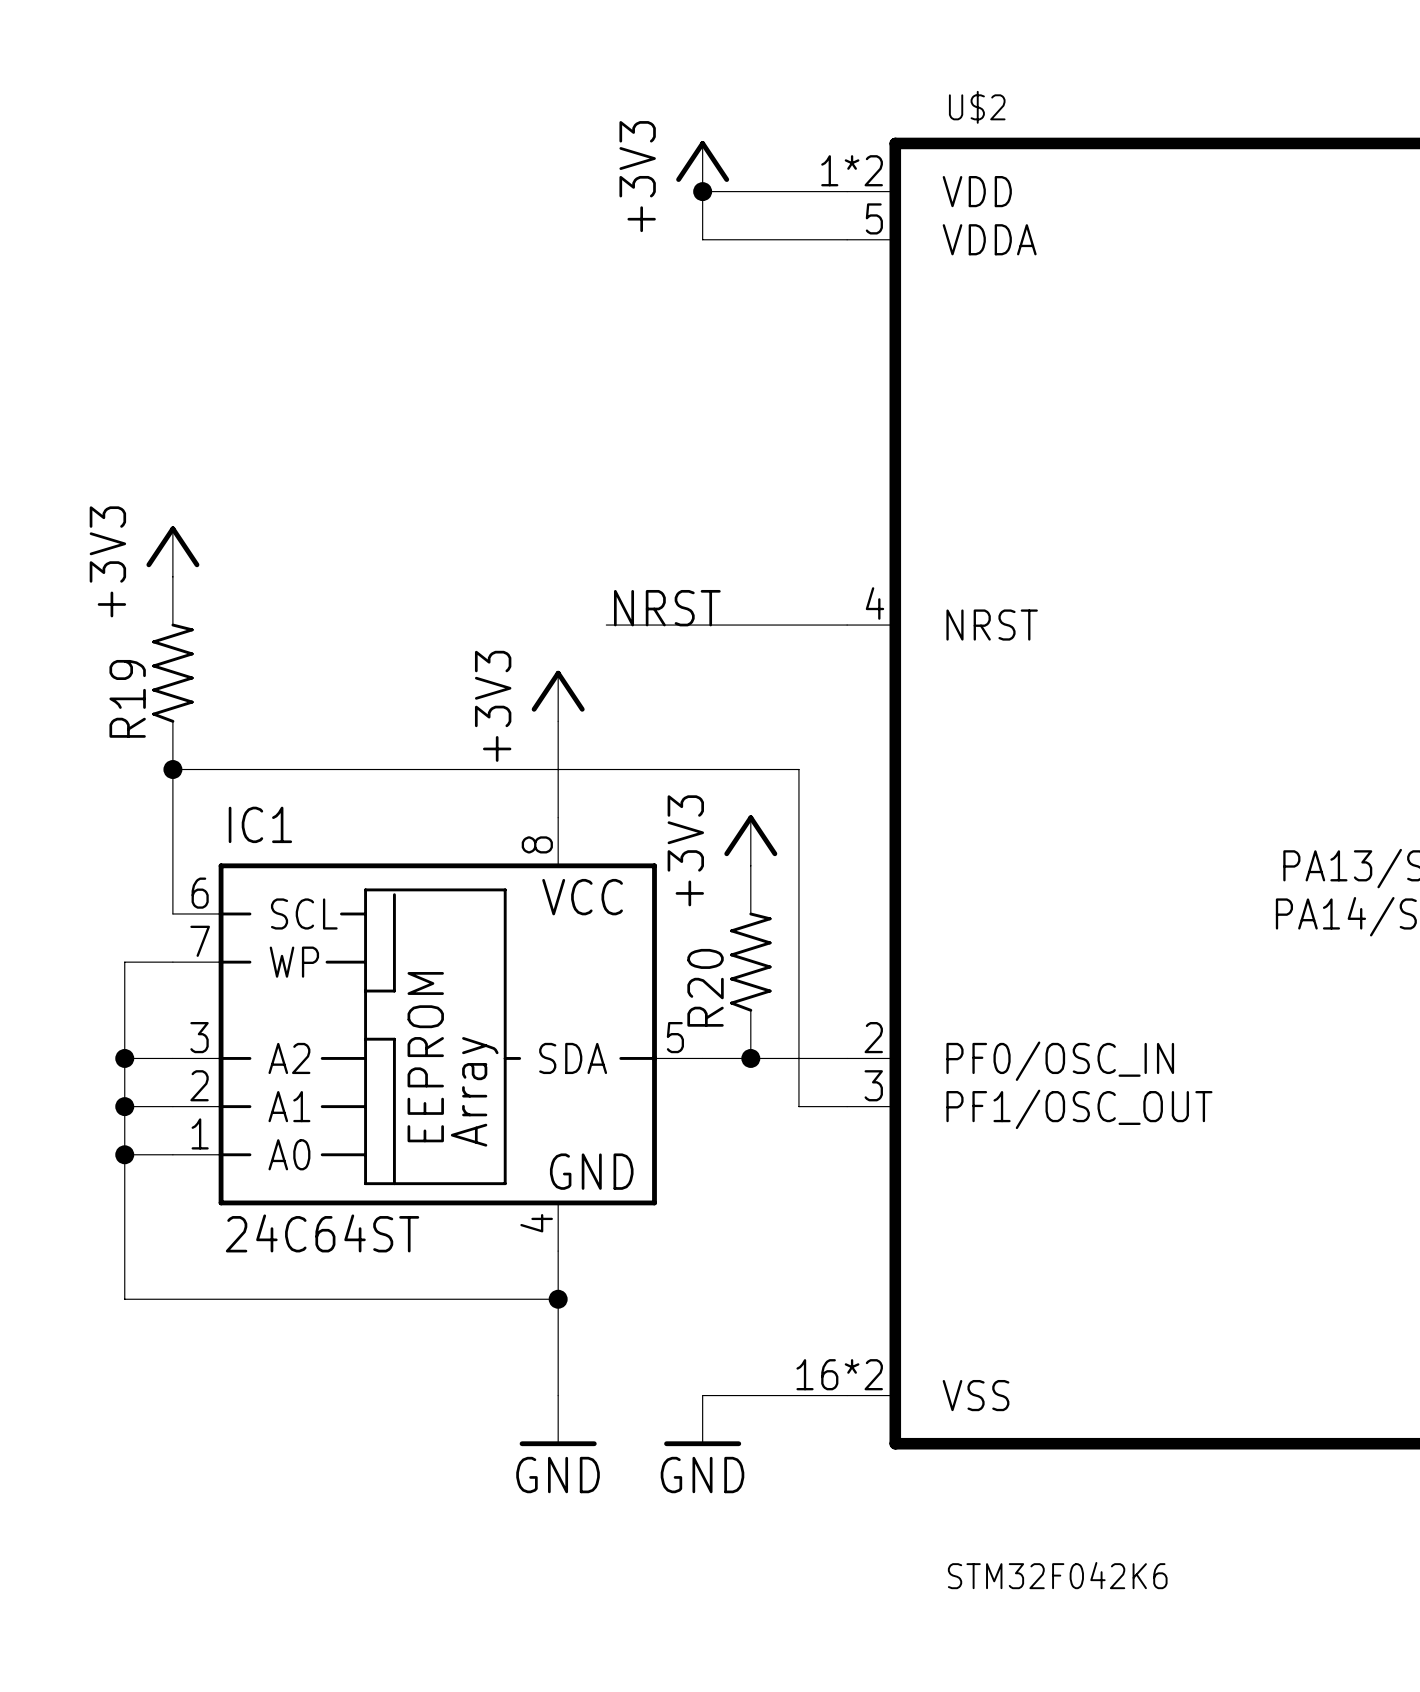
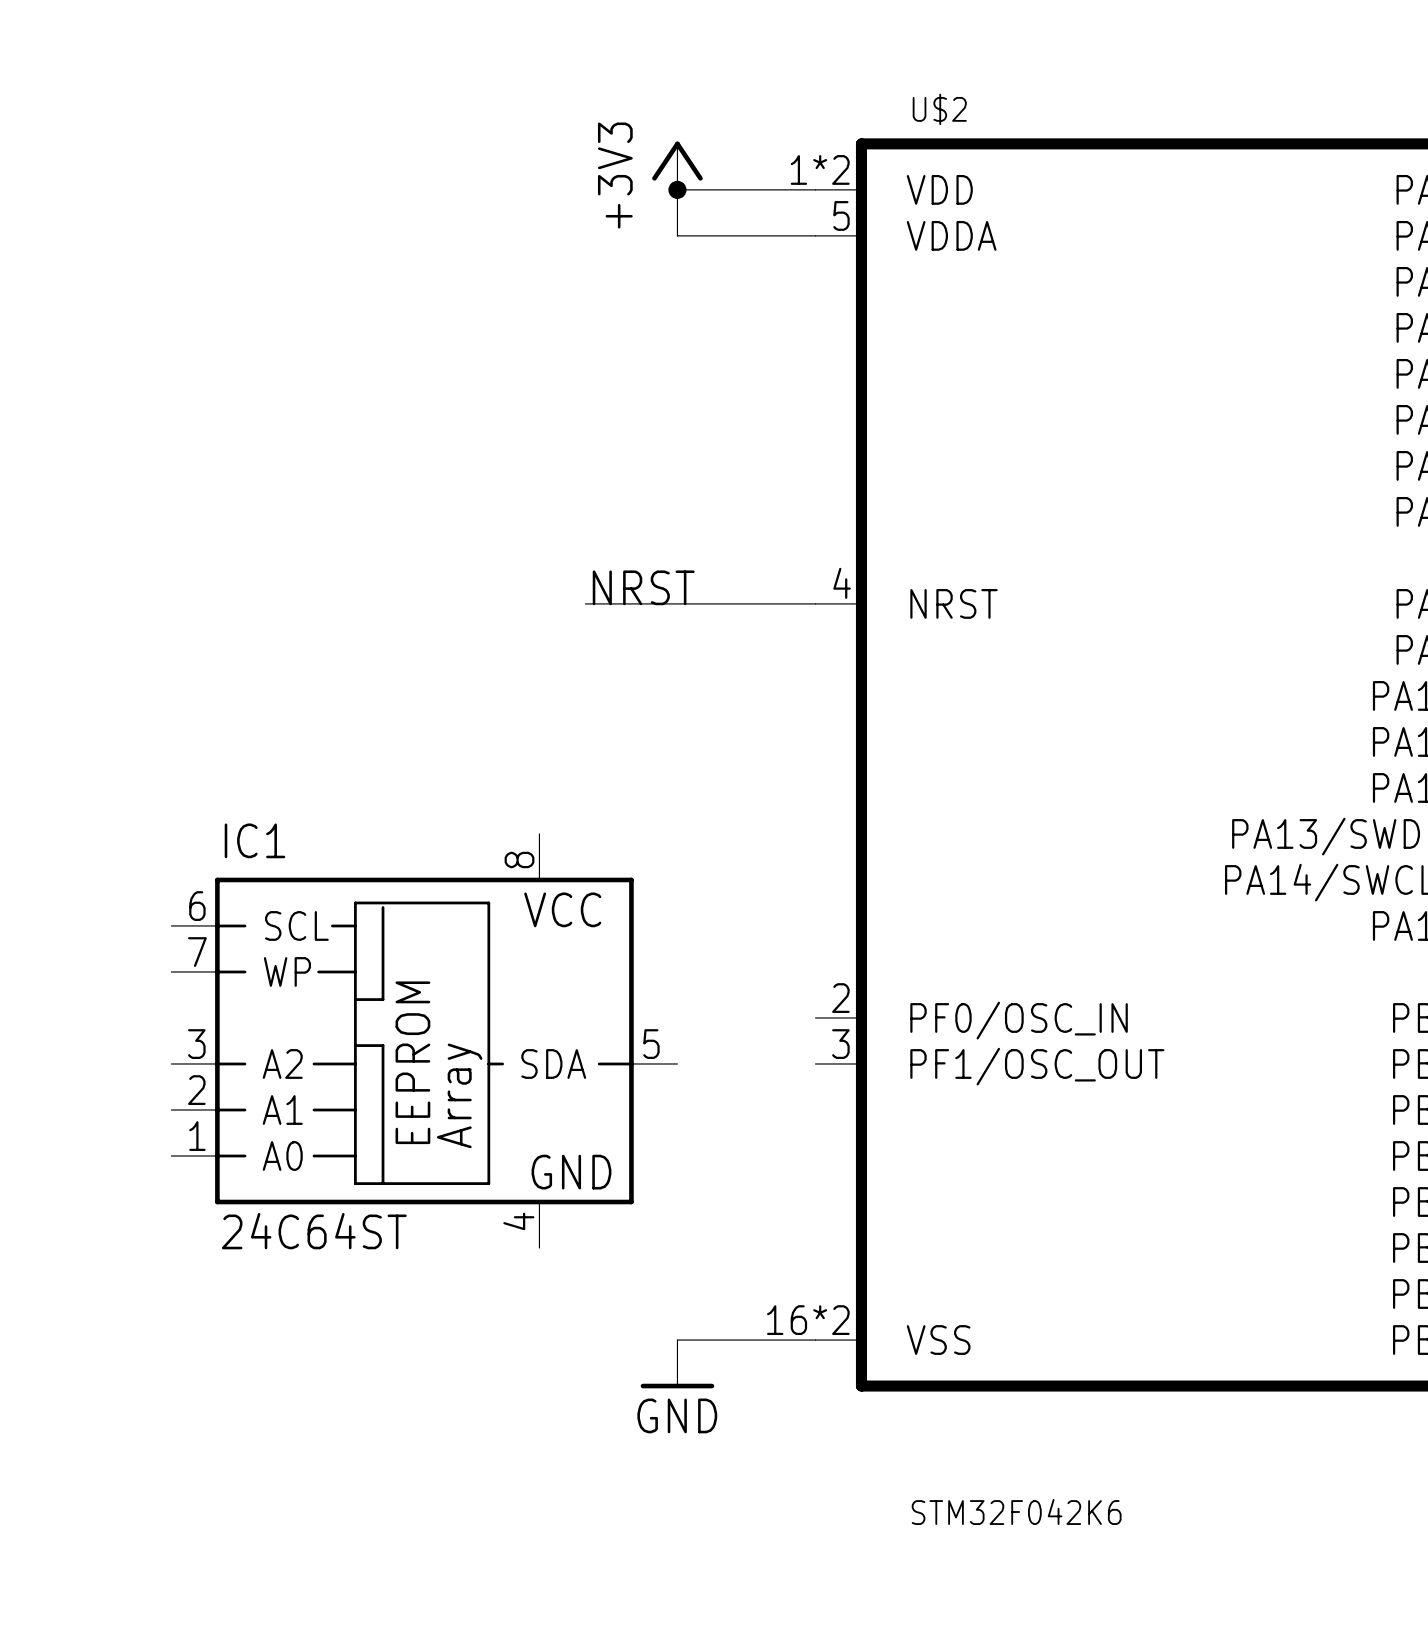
power symbol: +3V3 (172, 551) -> none
R19: (172, 673) -> none
power symbol: +3V3 (558, 696) -> none
wire: (558, 721) (558, 817) -> none
junction: (172, 769) -> none
power symbol: +3V3 (750, 840) -> none
wire: (172, 913) (172, 769) (798, 769) (798, 1106) (847, 1106) -> none
wire: (172, 962) (124, 962) (124, 1299) (558, 1299) -> none
R20: (750, 962) -> none
IC1 position: (437, 1034) -> (424, 1040)
wire: (124, 1058) (172, 1058) -> none
junction: (124, 1058) -> none
wire: (702, 1058) (847, 1058) -> none
junction: (750, 1058) -> none
wire: (124, 1106) (172, 1106) -> none
junction: (124, 1106) -> none
wire: (124, 1154) (172, 1154) -> none
junction: (124, 1154) -> none
wire: (558, 1251) (558, 1395) -> none
junction: (558, 1299) -> none
power symbol: GND (558, 1420) -> none

